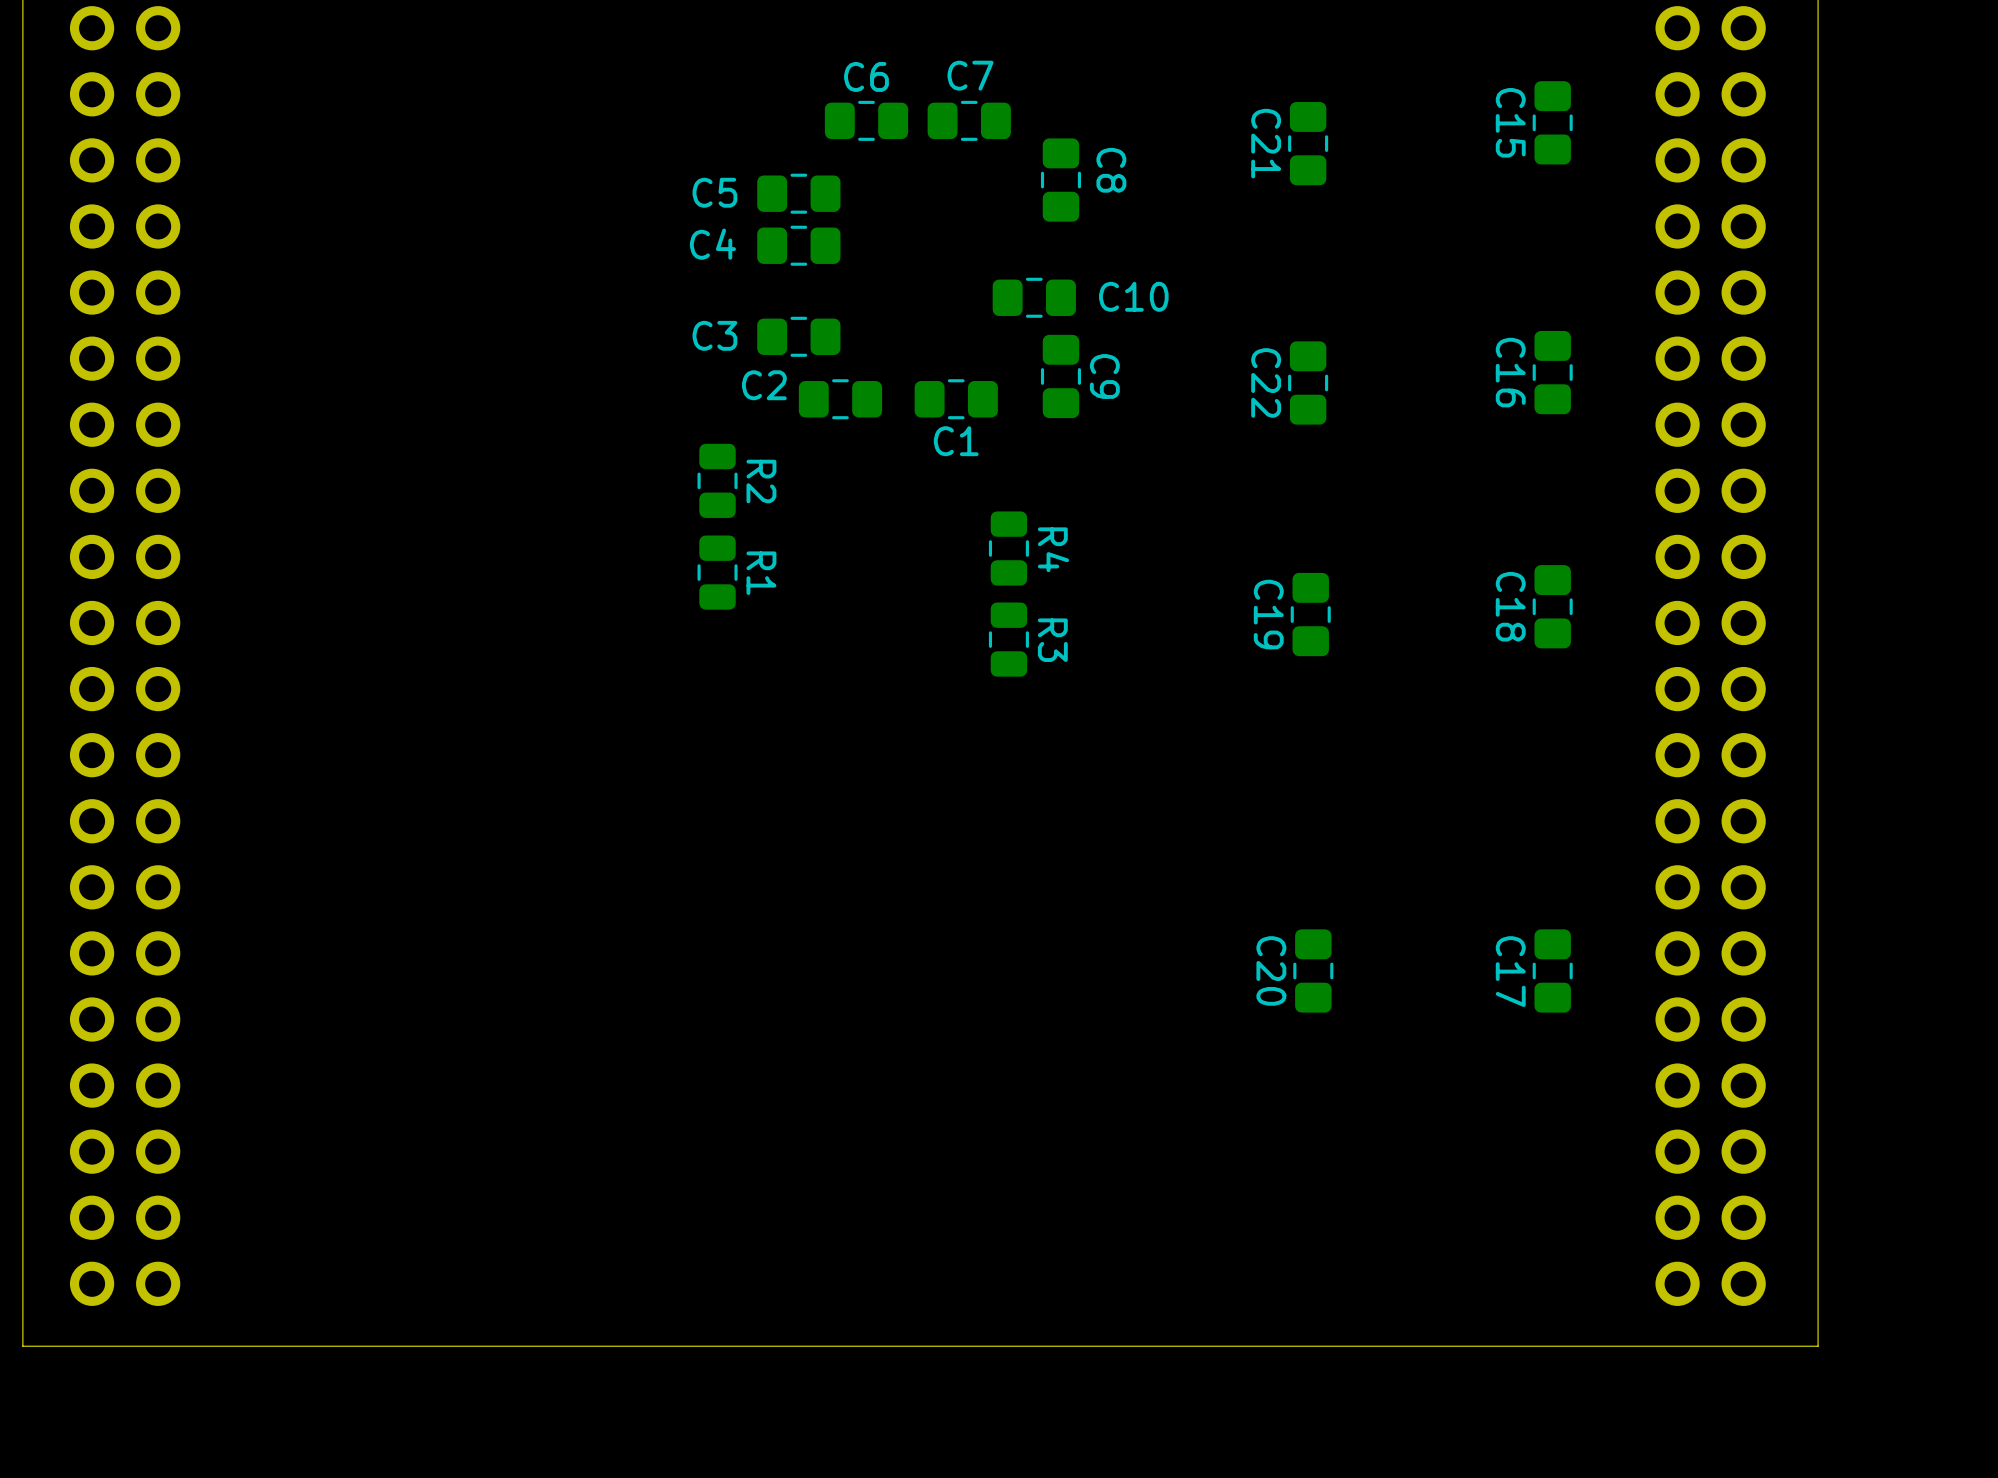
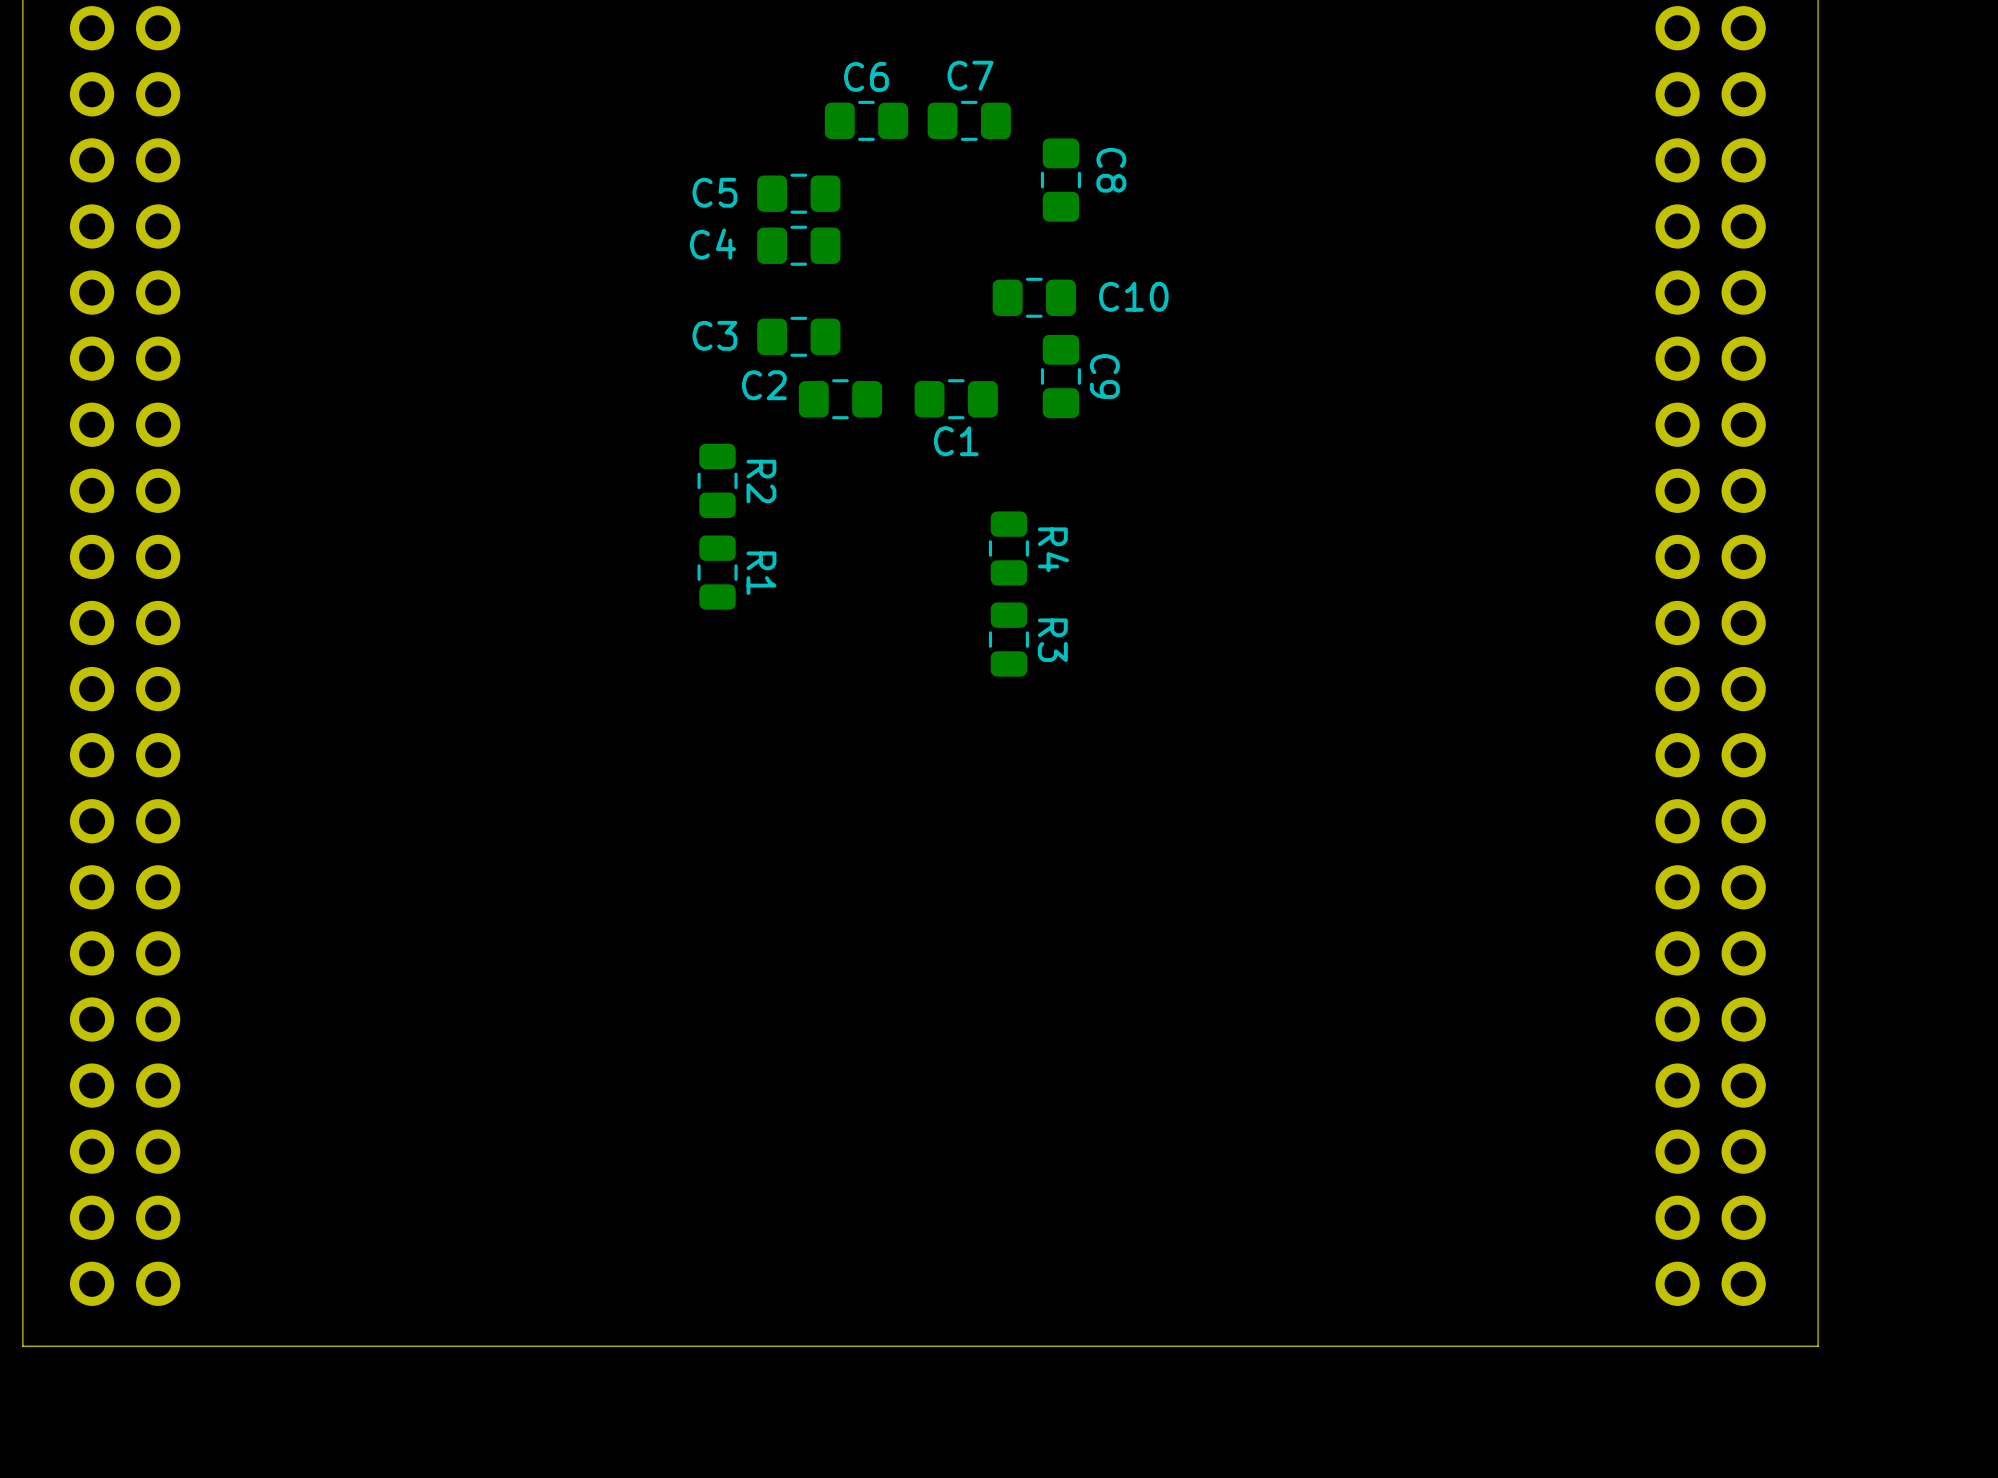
C15: (1552, 122) -> none
C21: (1308, 143) -> none
C16: (1552, 372) -> none
C22: (1308, 382) -> none
C18: (1552, 606) -> none
C19: (1310, 614) -> none
C20: (1313, 970) -> none
C17: (1552, 970) -> none

